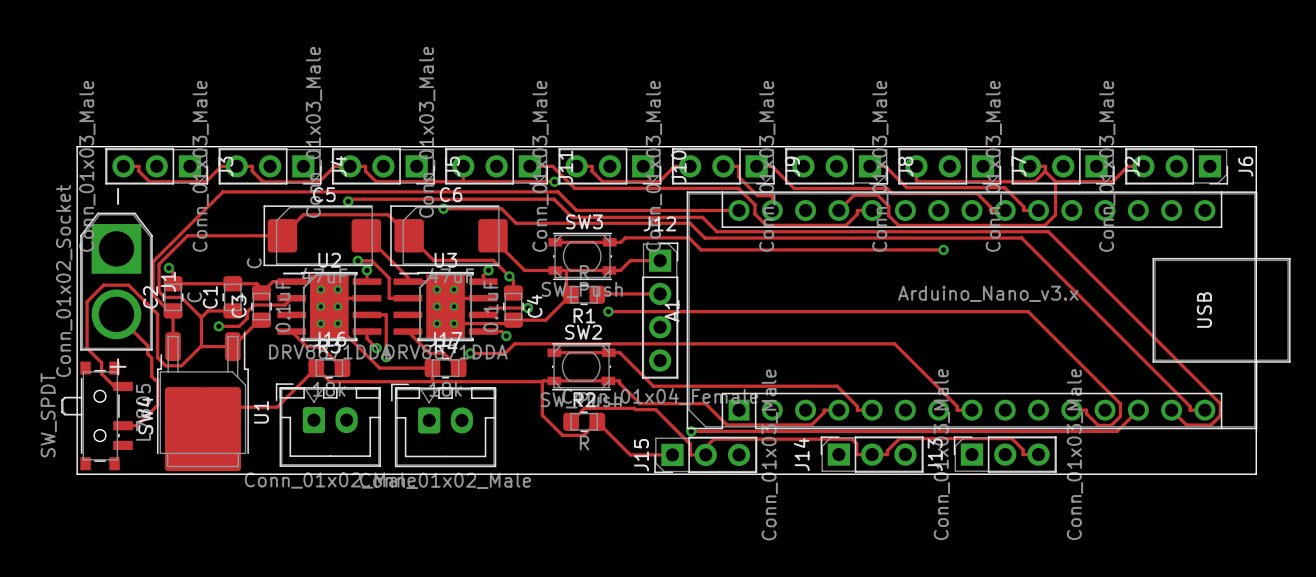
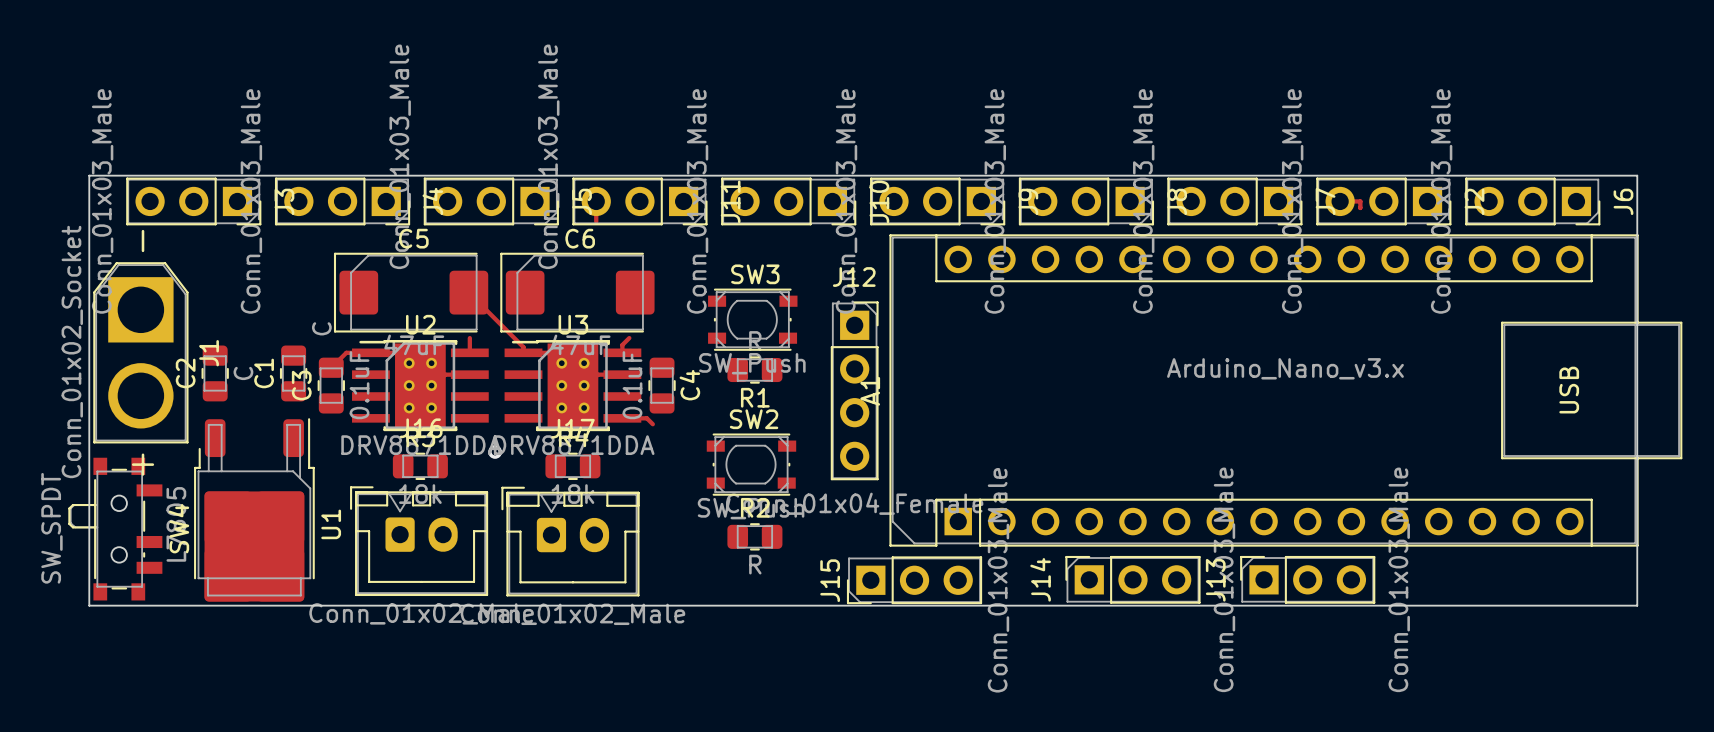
track: (123, 166) (138, 166) (138, 171) (149, 181) (205, 181) (221, 166) (252, 166) (252, 171) (263, 181) (319, 181) (334, 166) (365, 166) (365, 171) (376, 181) (554, 181) -> none
track: (529, 166) (552, 166) (574, 188) (738, 188) (754, 204) (754, 214) (766, 225) (846, 225) (857, 214) (857, 210) (872, 210) -> none
track: (576, 166) (592, 166) (592, 171) (602, 181) (659, 181) (674, 166) (690, 166) -> none
track: (723, 166) (738, 166) (738, 176) (757, 195) (772, 195) (772, 210) -> none
track: (756, 166) (772, 166) (794, 188) (887, 188) (892, 193) (977, 193) (990, 206) (990, 210) (1005, 210) -> none
track: (869, 166) (885, 166) (906, 187) (1004, 187) (1023, 206) (1023, 210) (1038, 210) -> none
track: (916, 166) (916, 181) (1034, 181) (1045, 171) (1055, 181) -> none
track: (1143, 166) (1127, 166) (1112, 181) (1055, 181) -> none
via: (554, 181) -> none
track: (1055, 181) (1055, 214) (1044, 225) (898, 225) (888, 215) (888, 206) (877, 195) (854, 195) (838, 210) -> none
track: (348, 201) (350, 199) (554, 199) (572, 217) (702, 217) (716, 231) (1048, 231) (1220, 403) (1220, 415) (1211, 425) (1186, 425) (1171, 410) -> none
via: (348, 201) -> none
track: (443, 208) (501, 208) (516, 223) (690, 223) (704, 238) (1021, 238) (1190, 406) (1190, 410) (1204, 410) -> none
via: (443, 208) -> none
track: (739, 210) (576, 210) (558, 191) (222, 191) (153, 261) (153, 295) (168, 310) (173, 310) (173, 346) -> none
track: (492, 235) (492, 238) (524, 270) (620, 270) (630, 260) (660, 260) -> none
track: (555, 242) (620, 242) (625, 237) (689, 237) (701, 249) (943, 249) -> none
via: (943, 249) -> none
track: (357, 260) (371, 260) (389, 278) (389, 298) (407, 298) -> none
via: (357, 260) -> none
track: (168, 268) (173, 272) (173, 283) (256, 283) (261, 288) (261, 293) -> none
via: (168, 268) -> none
via: (367, 270) -> none
via: (488, 270) -> none
track: (566, 270) (566, 290) (571, 294) (545, 320) (513, 320) -> none
via: (509, 276) -> none
track: (513, 293) (513, 280) (493, 260) (433, 260) (388, 214) (303, 214) (282, 235) (187, 235) (159, 264) (159, 291) (164, 297) (181, 297) (201, 317) -> none
track: (660, 293) (597, 294) -> none
track: (291, 298) (284, 305) (254, 305) (247, 311) (247, 318) (239, 326) (218, 326) -> none
track: (527, 308) (490, 308) (483, 314) -> none
via: (527, 308) -> none
track: (232, 310) (207, 310) (201, 317) -> none
track: (608, 311) (1028, 311) (1120, 403) (1120, 416) (1111, 425) (1098, 425) (1086, 413) (1086, 410) (1071, 410) -> none
via: (608, 311) -> none
track: (116, 314) (147, 345) (147, 354) (151, 358) (151, 376) (157, 379) (157, 405) (137, 425) (123, 425) -> none
track: (367, 314) (386, 315) (386, 357) -> none
track: (201, 317) (201, 345) -> none
track: (261, 320) (259, 320) (232, 346) (201, 345) -> none
track: (513, 320) (510, 323) (437, 323) -> none
track: (320, 323) (337, 323) (337, 326) (379, 368) (432, 368) (432, 381) -> none
via: (218, 326) -> none
track: (291, 331) (306, 346) (321, 346) (342, 368) -> none
track: (367, 331) (367, 338) (376, 348) -> none
track: (407, 331) (429, 353) (443, 353) (458, 368) -> none
via: (506, 336) -> none
track: (201, 345) (181, 365) (165, 365) (157, 357) (157, 314) (128, 285) (103, 285) (87, 301) (87, 348) (101, 362) (101, 373) (114, 386) (123, 386) -> none
via: (376, 348) -> none
track: (554, 352) (619, 352) (653, 386) (837, 386) (857, 406) (857, 410) (872, 410) -> none
track: (470, 353) (505, 353) (514, 343) (894, 343) (957, 406) (957, 410) (971, 410) -> none
via: (470, 353) -> none
track: (542, 381) (329, 381) (316, 368) (277, 407) (182, 407) -> none
track: (542, 381) (542, 415) (562, 435) (583, 435) (597, 421) (630, 454) (672, 454) -> none
track: (542, 381) (619, 380) (619, 383) (640, 403) (705, 403) (726, 424) (811, 424) (824, 412) (824, 410) (838, 410) -> none
track: (1138, 410) (1117, 431) (691, 431) -> none
track: (571, 421) (584, 408) (655, 409) (690, 444) (690, 454) (705, 454) -> none
via: (691, 431) -> none
track: (1038, 454) (1023, 454) (1023, 449) (1011, 438) (899, 438) (887, 450) (887, 454) (856, 454) (856, 443) (852, 439) (713, 439) (698, 454) -> none

